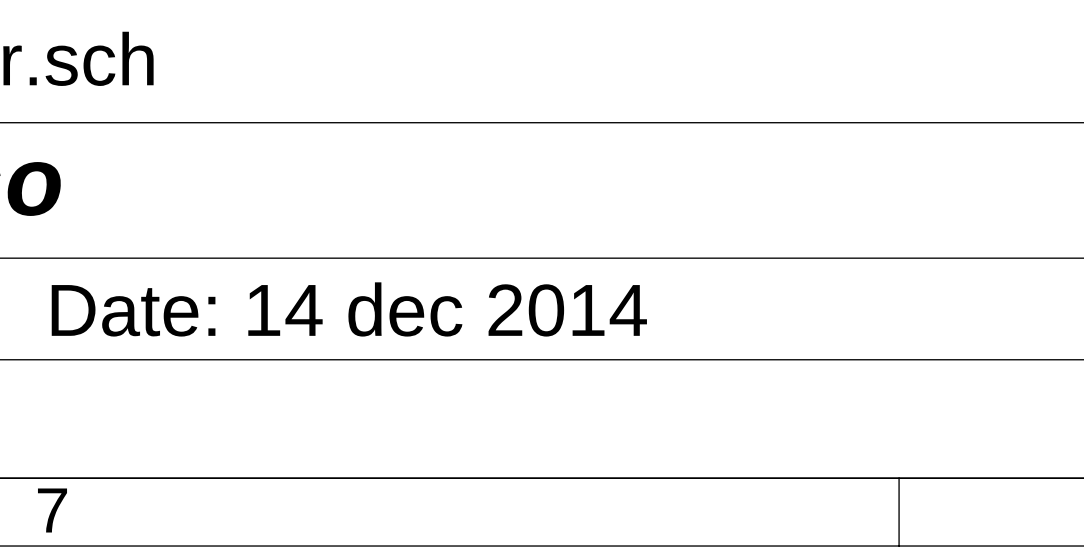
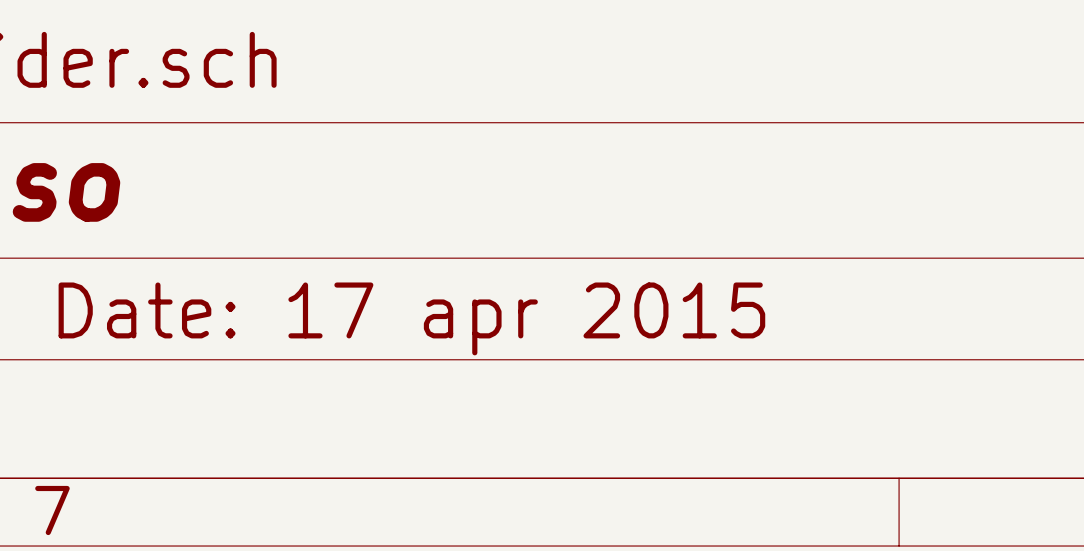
title block: Date: 14 dec 2014 (349, 309) -> Date: 17 apr 2015 (411, 318)

